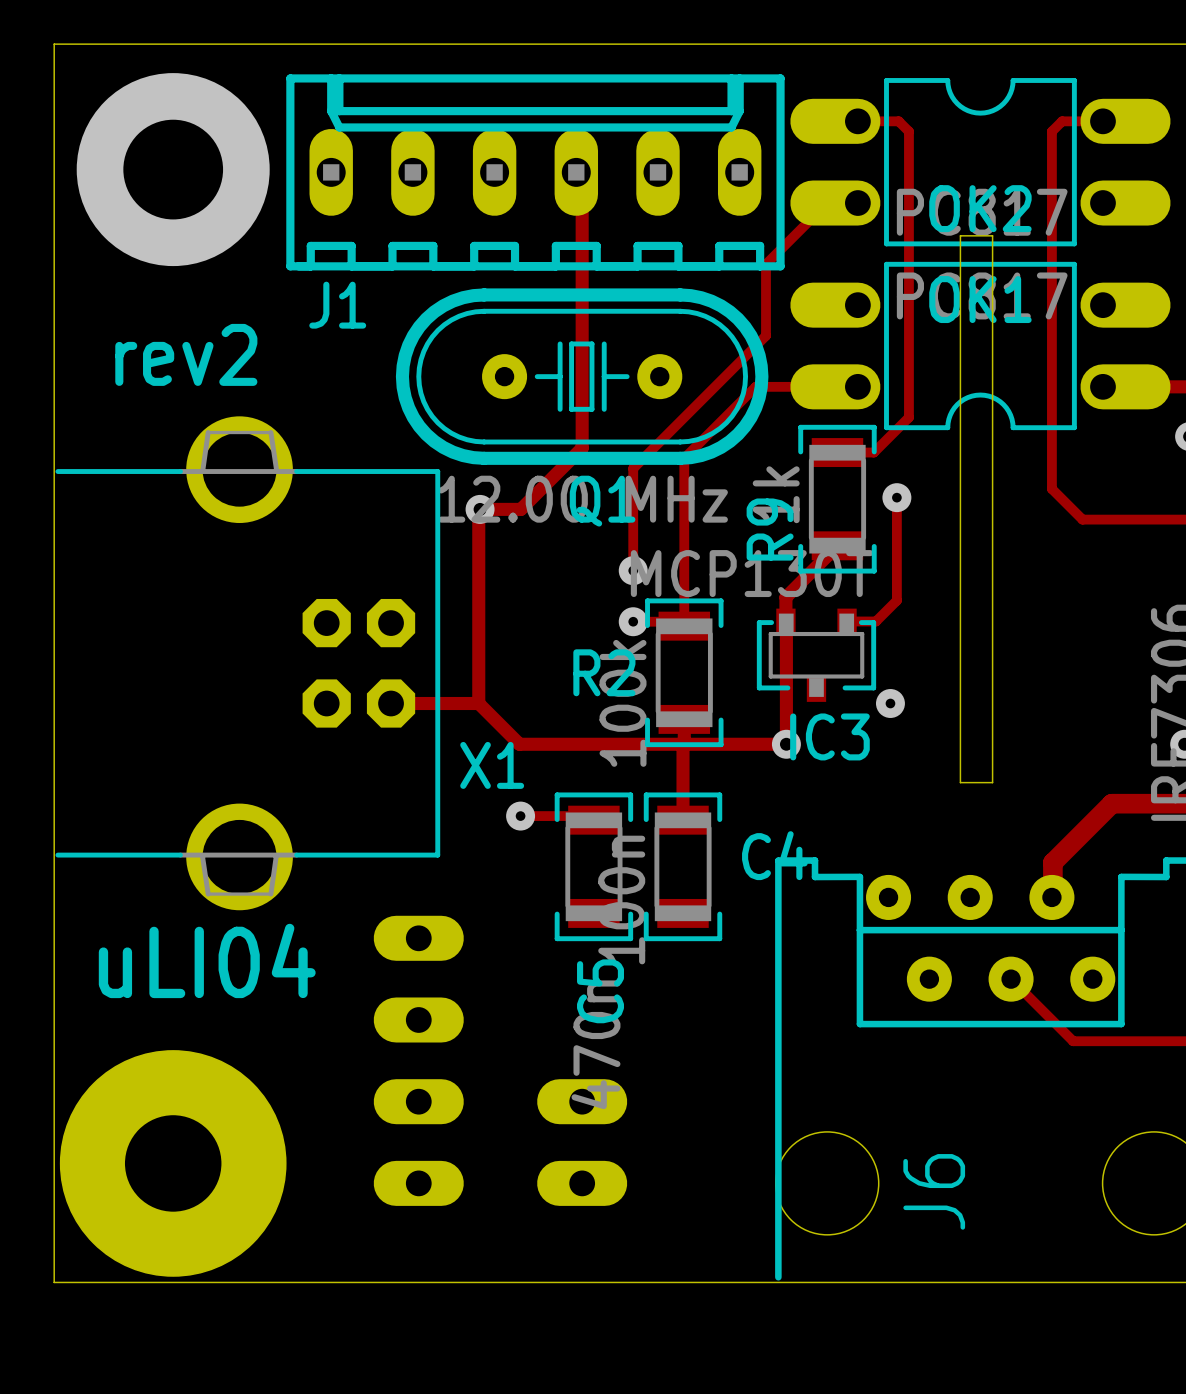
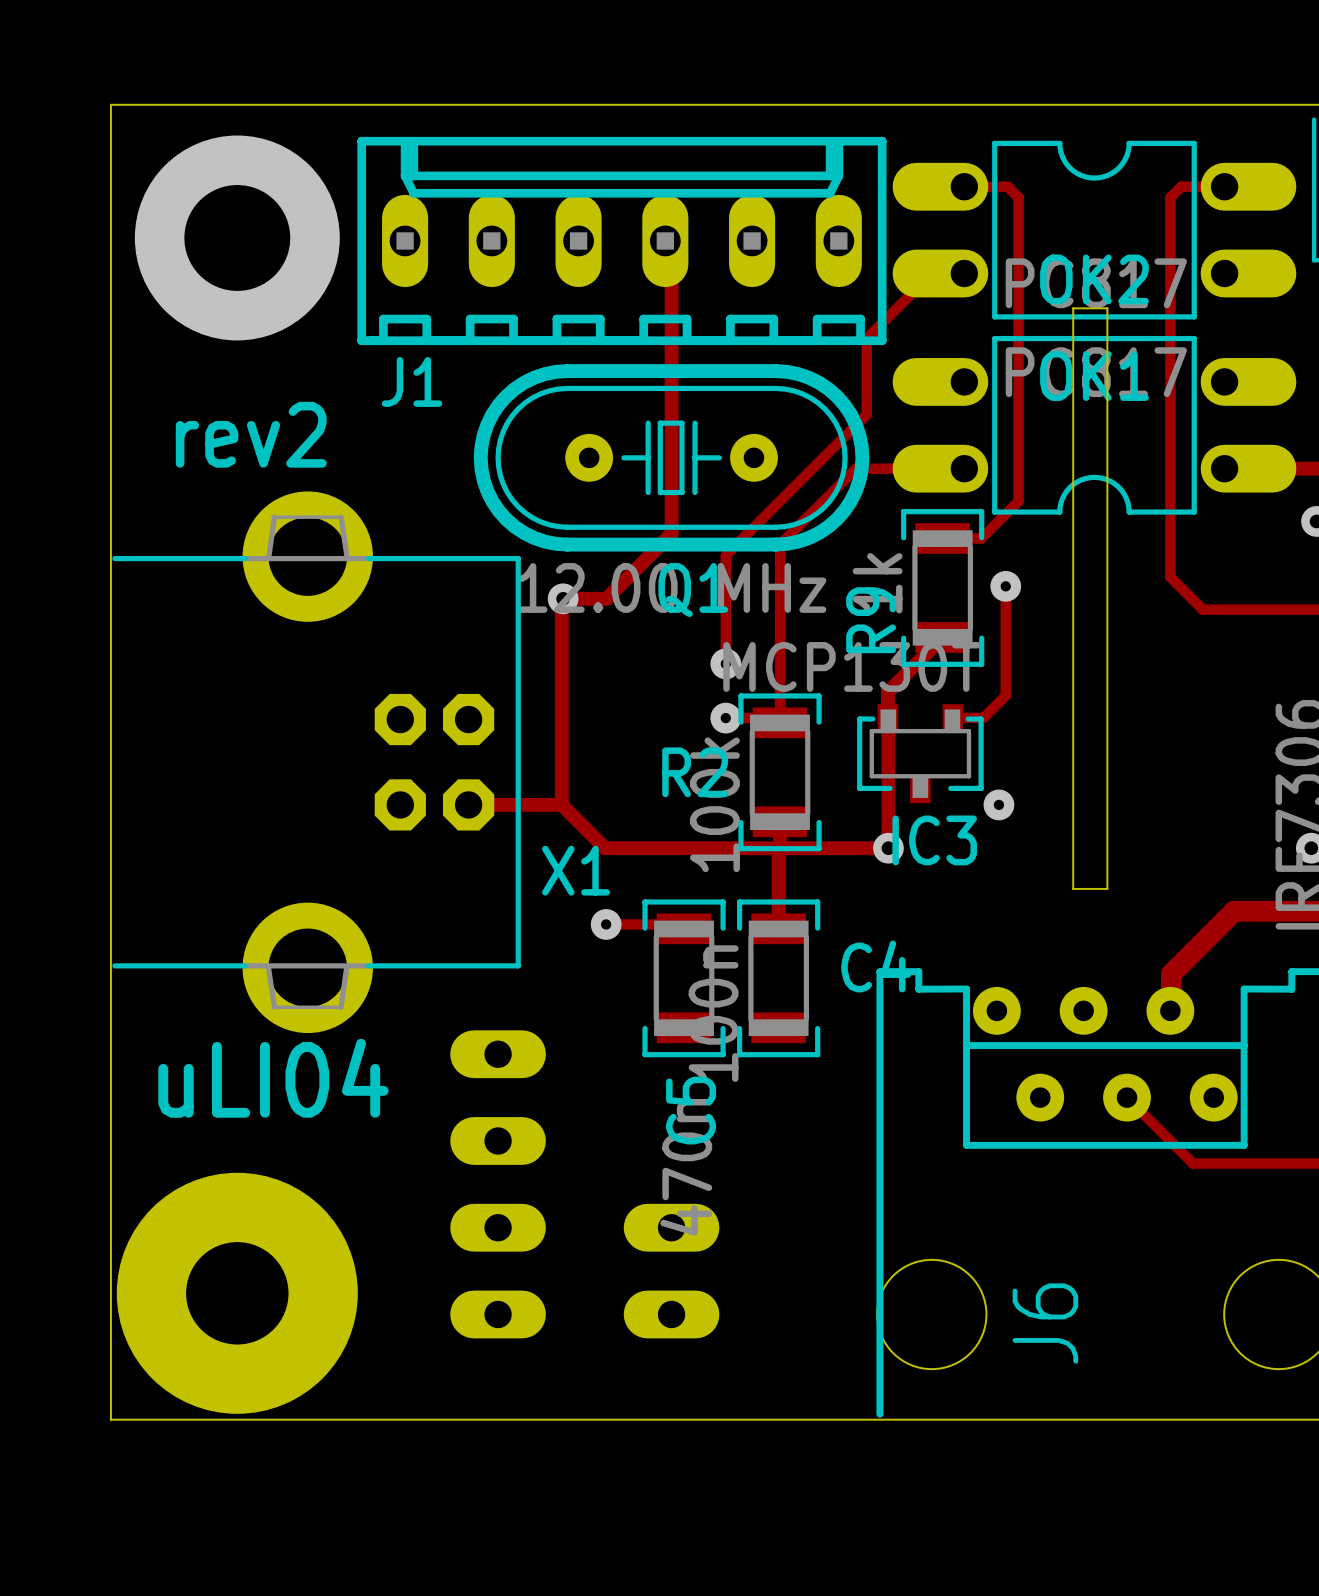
X1 footprint: [55, 416, 441, 911] -> [112, 491, 521, 1034]

